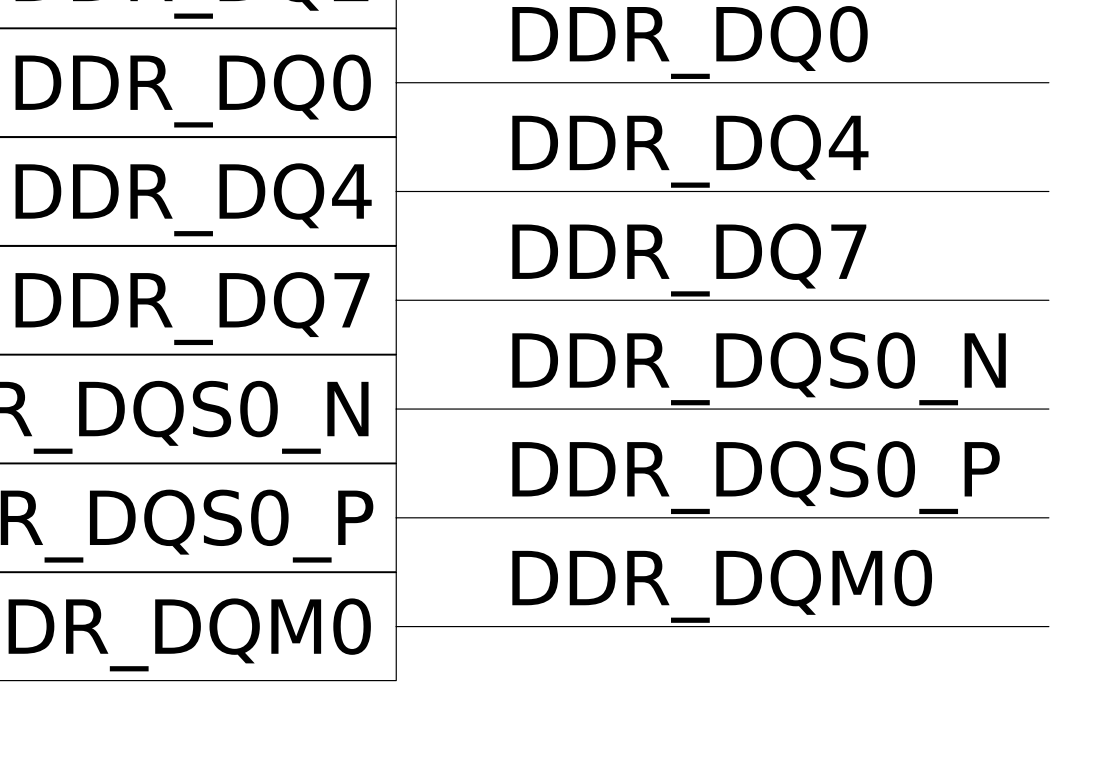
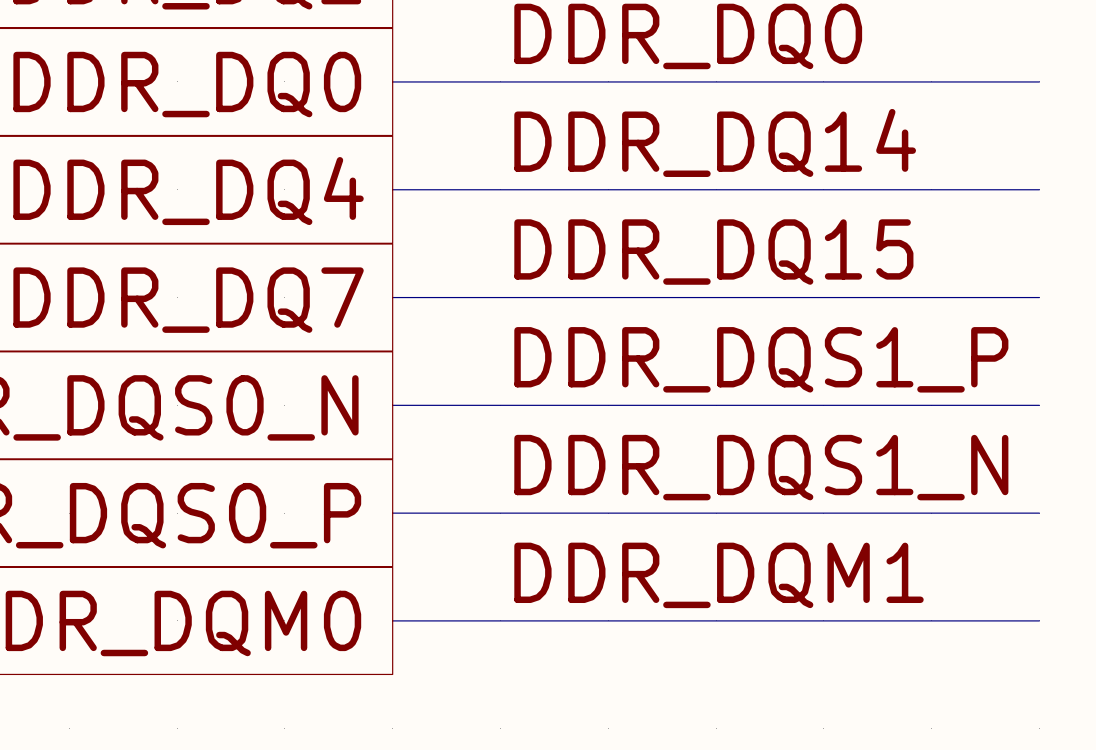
label: DDR_DQ4 (690, 151) -> DDR_DQ14 (715, 142)
label: DDR_DQ7 (689, 260) -> DDR_DQ15 (713, 252)
label: DDR_DQS0_N (759, 368) -> DDR_DQS1_P (761, 359)
label: DDR_DQS0_P (756, 477) -> DDR_DQS1_N (761, 467)
label: DDR_DQM0 (722, 586) -> DDR_DQM1 (719, 575)

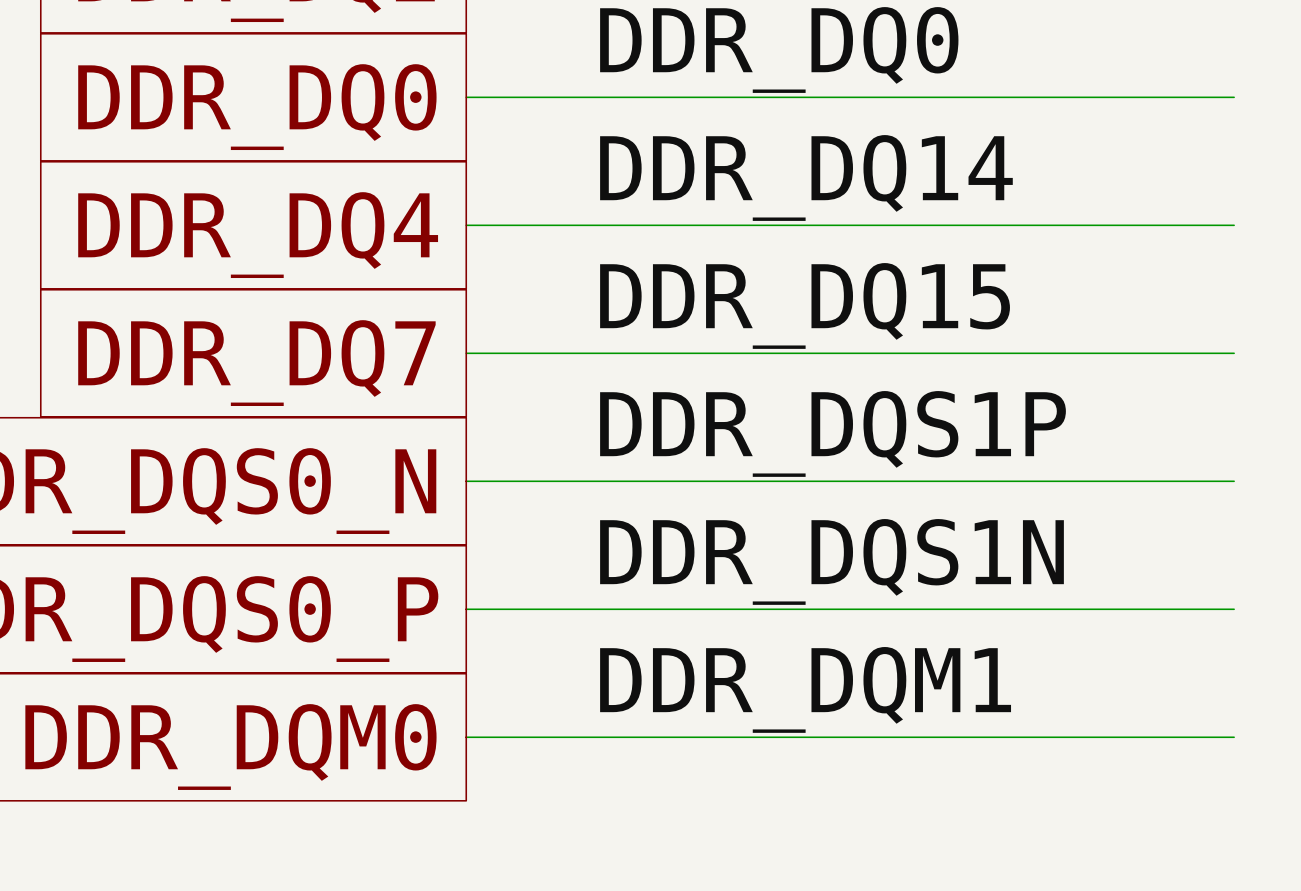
label: DDR_DQS1_P (761, 359) -> DDR_DQS1P (833, 433)
label: DDR_DQS1_N (761, 467) -> DDR_DQS1N (831, 561)

